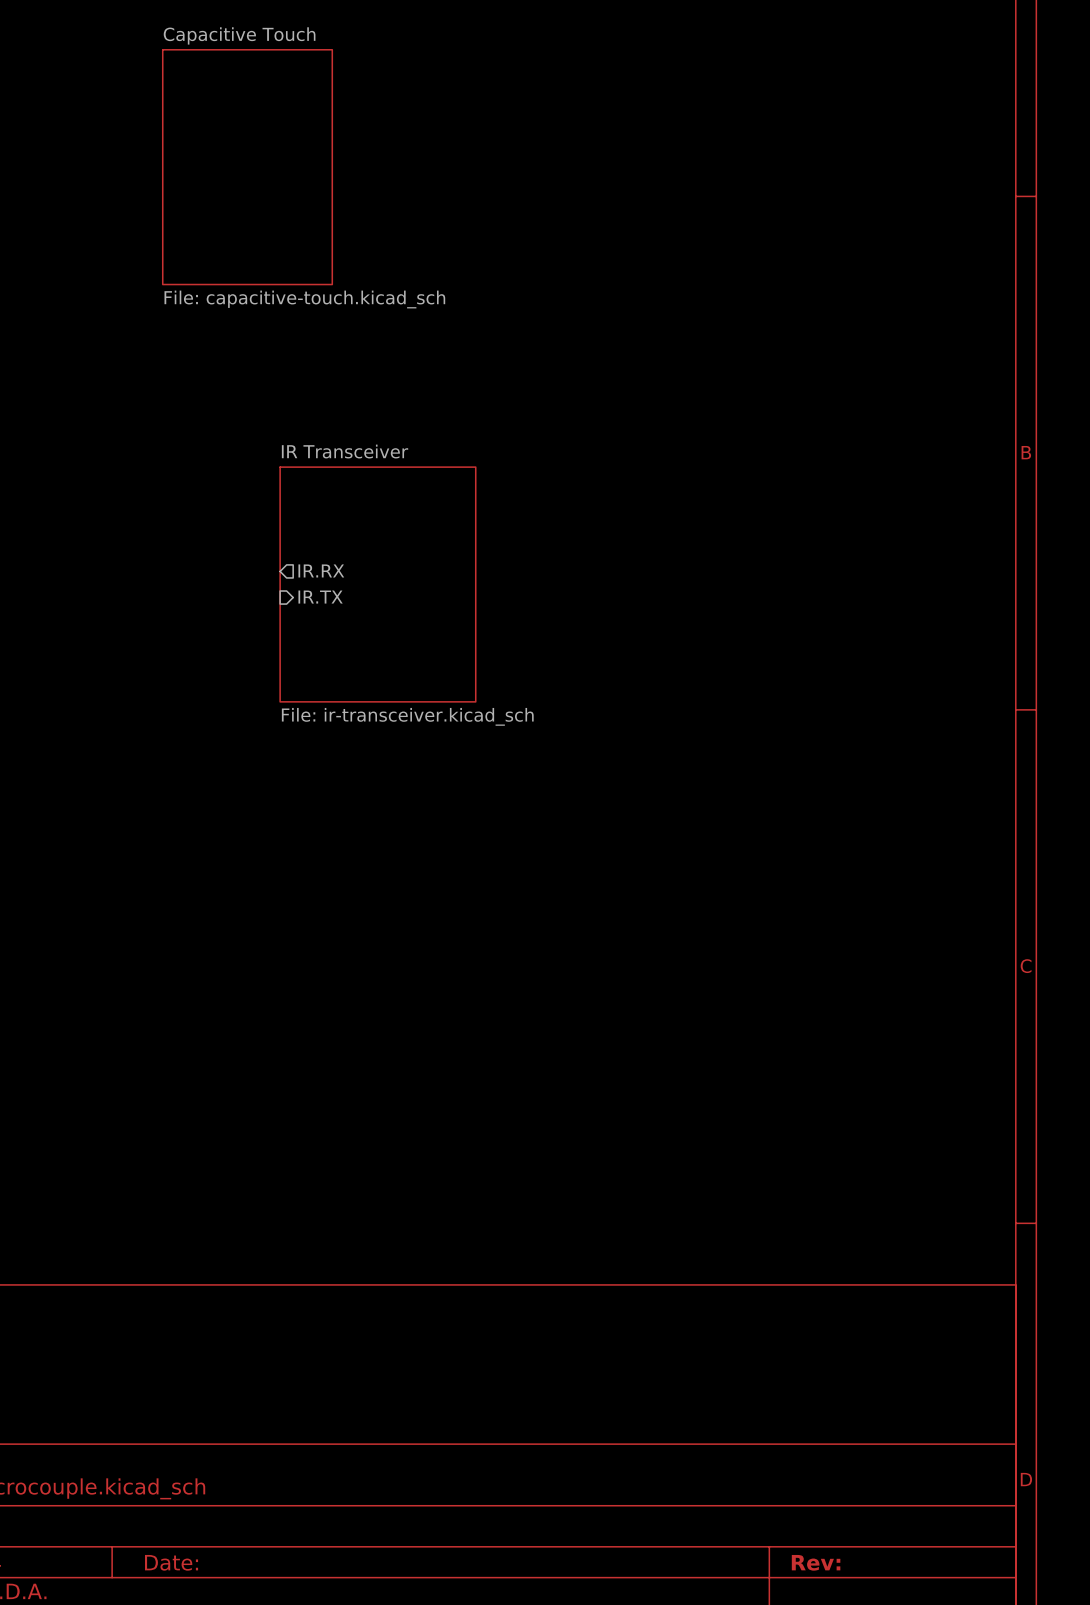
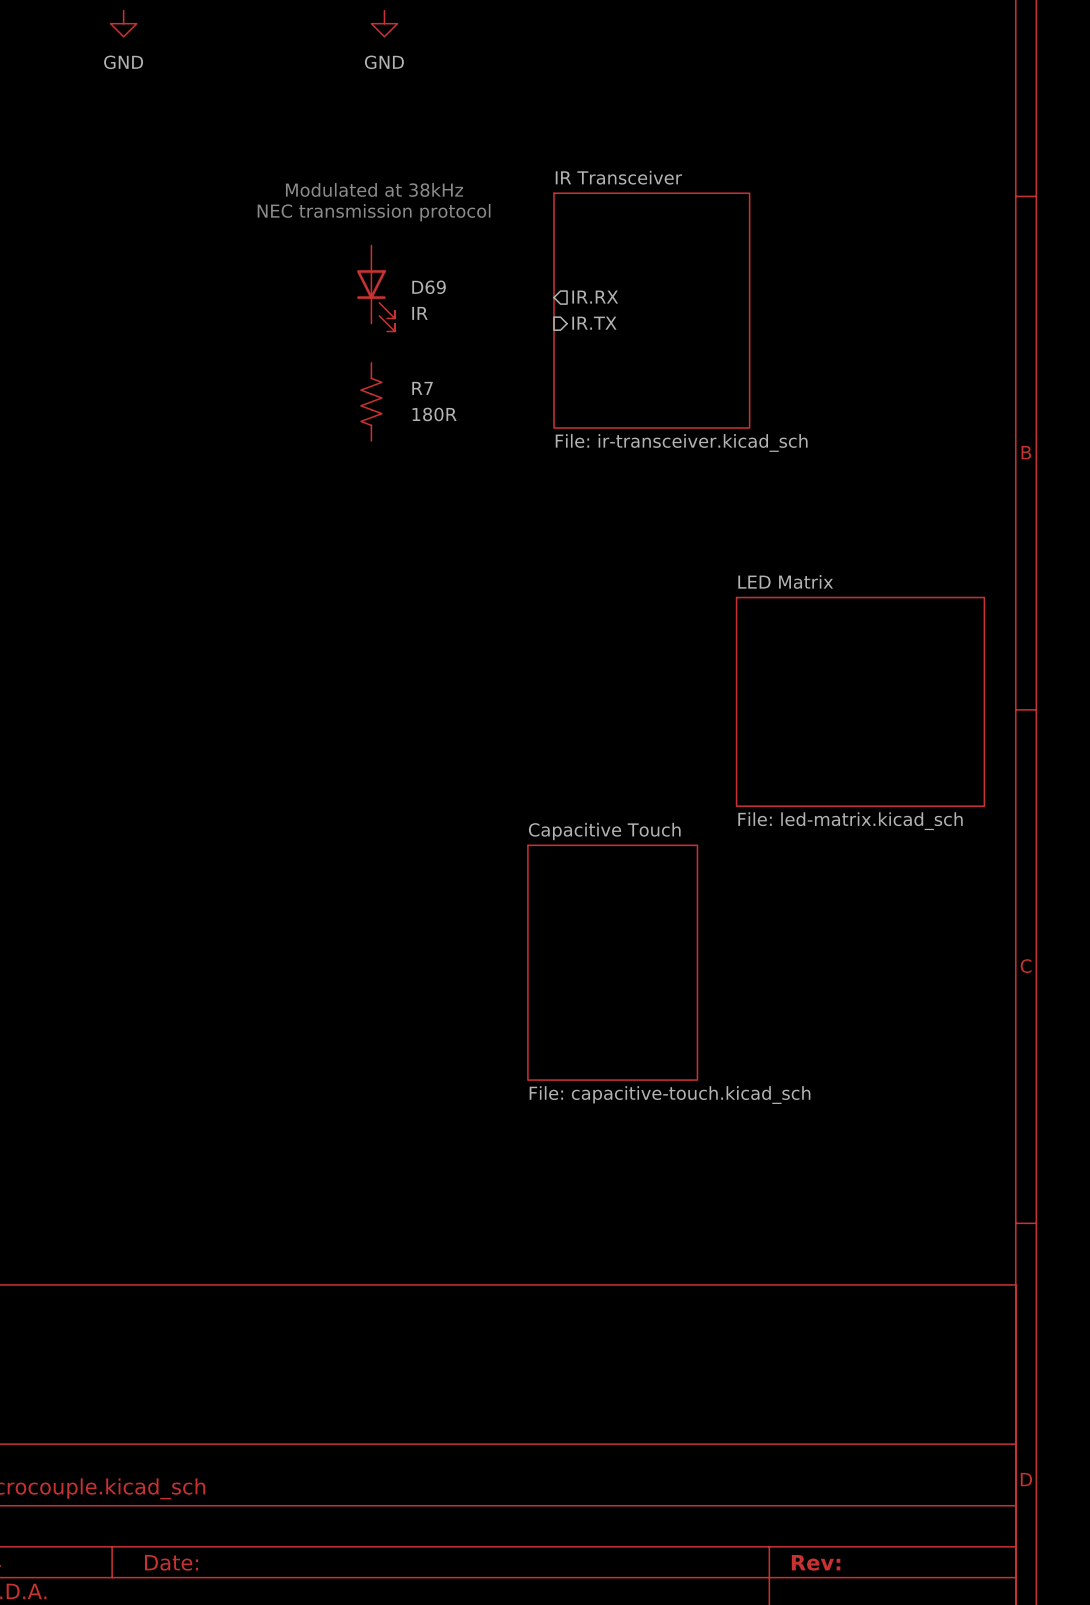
power symbol: none -> GND (123, 23)
power symbol: none -> GND (384, 23)
sheet Capacitive Touch: File: capacitive-touch.kicad_sch (247, 167) -> none
text: none -> Modulated at 38kHz (374, 189)
text: none -> NEC transmission protocol (374, 212)
D69: none -> IR (375, 288)
sheet pin: none -> IR.RX (595, 297)
sheet IR Transceiver: none -> File: ir-transceiver.kicad_sch (651, 310)
sheet pin: none -> IR.TX (594, 323)
R7: none -> 180R (371, 401)
sheet pin: IR.RX (321, 570) -> none
sheet IR Transceiver: File: ir-transceiver.kicad_sch (377, 584) -> none
sheet pin: IR.TX (320, 597) -> none
sheet LED Matrix: none -> File: led-matrix.kicad_sch (860, 701)
sheet Capacitive Touch: none -> File: capacitive-touch.kicad_sch (612, 962)

